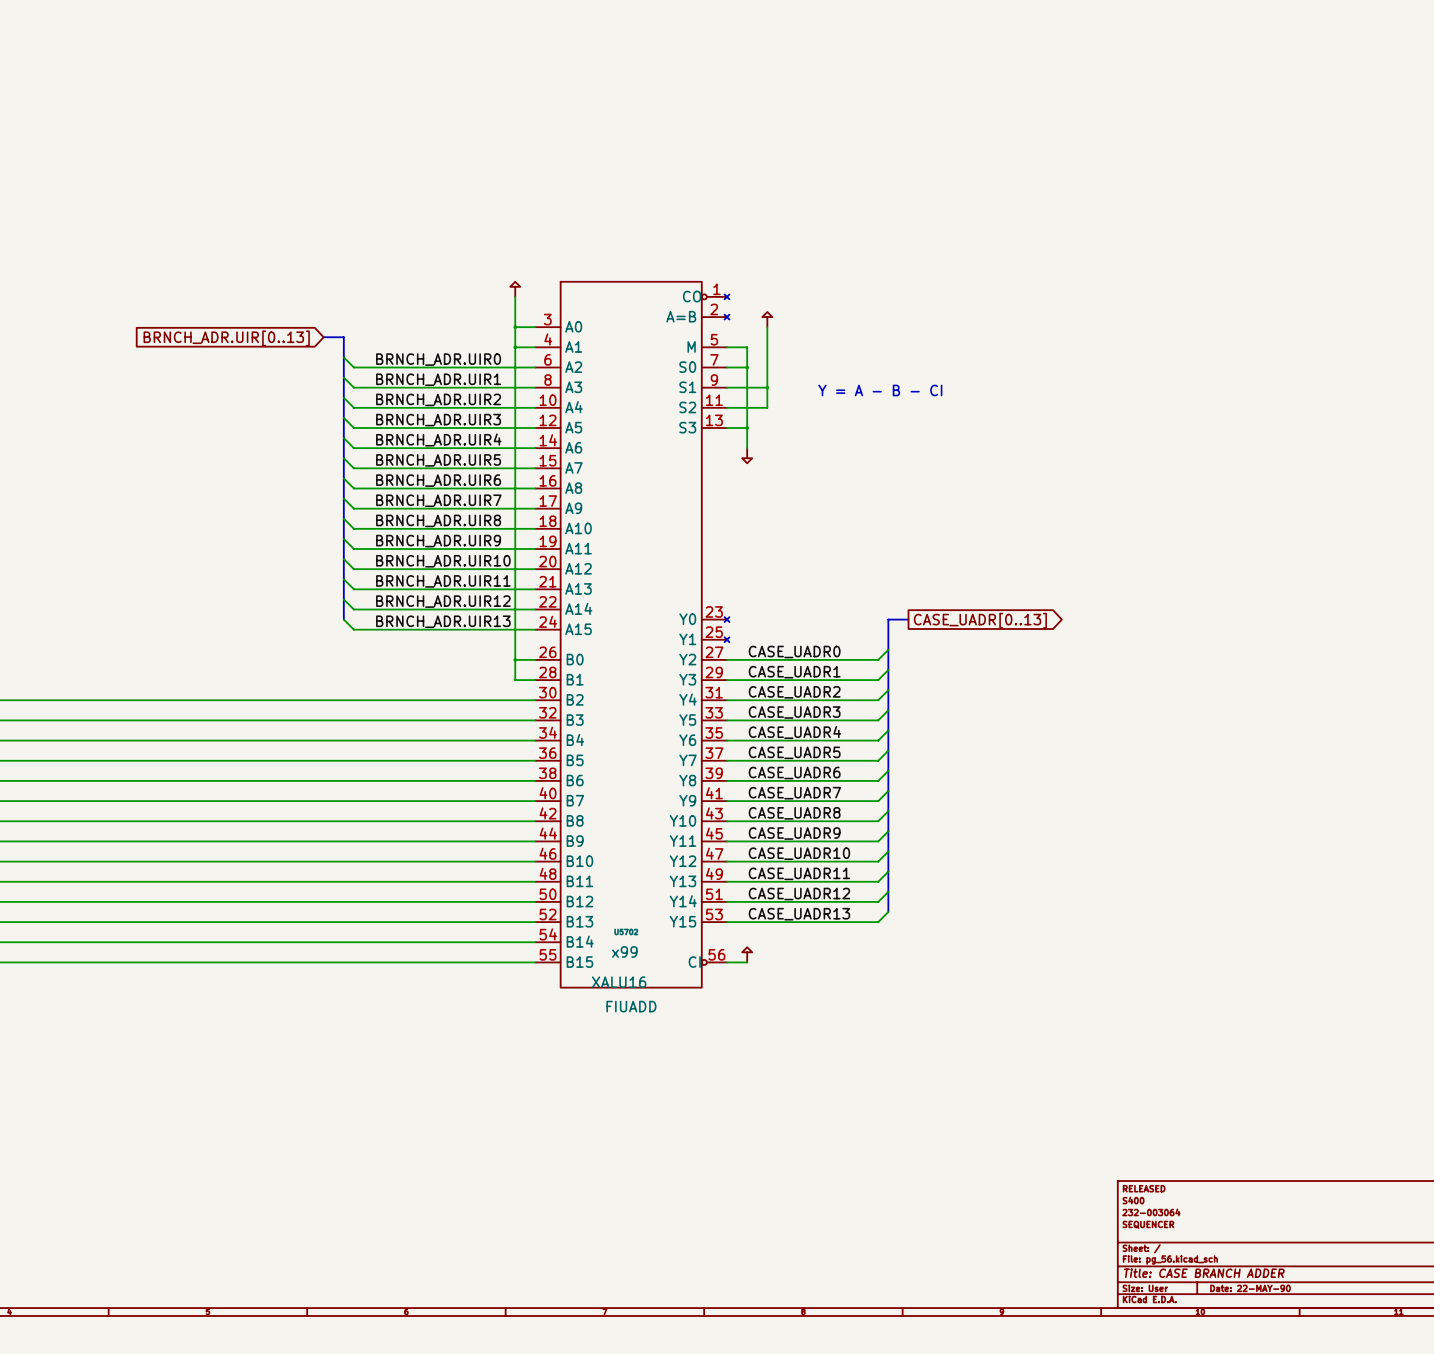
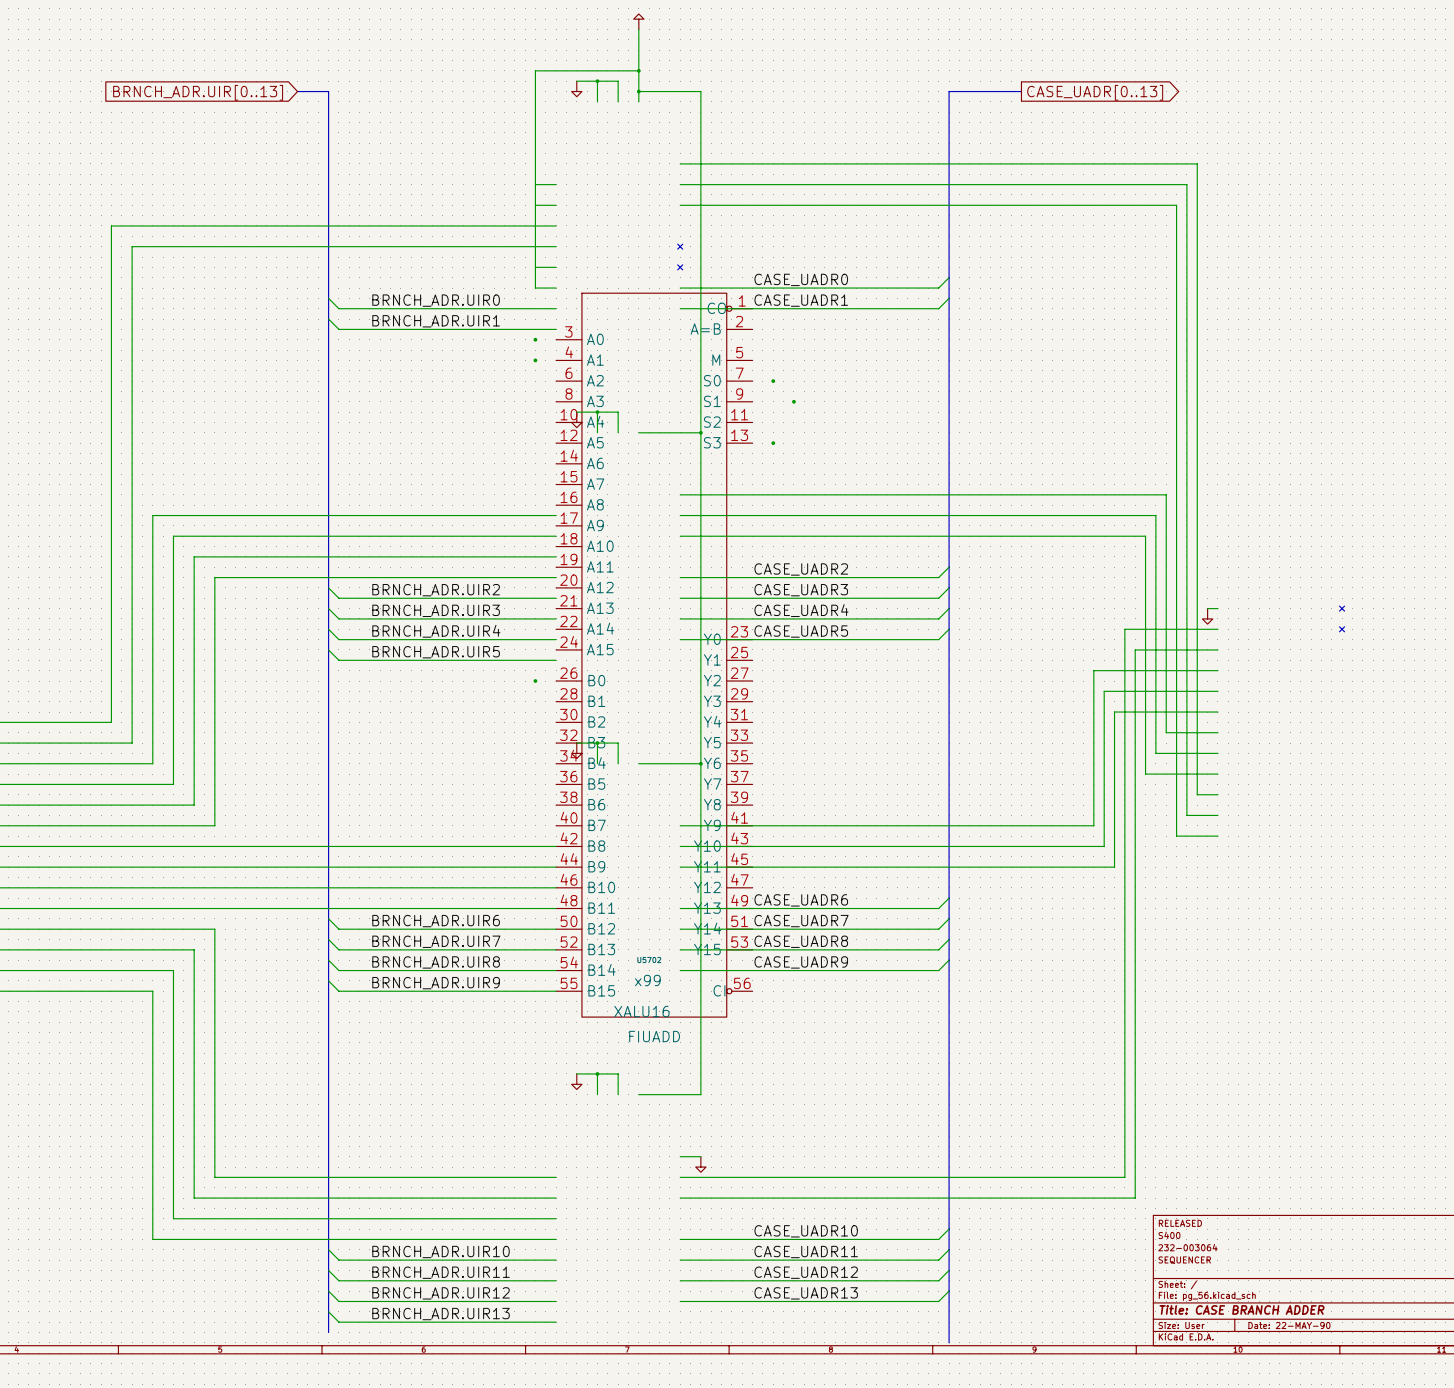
power symbol: none -> (638, 21)
wire: none -> (638, 29) (638, 101)
wire: none -> (638, 70) (535, 70) (535, 288) (556, 288)
junction: none -> (638, 70)
wire: none -> (576, 81) (618, 81) (618, 101)
wire: none -> (597, 81) (597, 101)
junction: none -> (597, 81)
power symbol: none -> (576, 89)
bus: none -> (297, 91) (328, 91) (328, 1332)
wire: none -> (638, 91) (700, 91) (700, 1094) (638, 1094)
junction: none -> (638, 91)
bus: none -> (1021, 91) (949, 91) (949, 1342)
global label: none -> BRNCH_ADR.UIR[0..13] (198, 92)
global label: none -> CASE_UADR[0..13] (1095, 92)
wire: none -> (680, 163) (1197, 163) (1197, 794) (1217, 794)
wire: none -> (535, 184) (556, 184)
wire: none -> (680, 184) (1186, 184) (1186, 815) (1217, 815)
wire: none -> (535, 205) (556, 205)
wire: none -> (680, 205) (1176, 205) (1176, 836) (1217, 836)
no-connect mark: none -> (680, 246)
no-connect mark: none -> (680, 267)
wire: none -> (949, 277) (938, 288) (680, 288)
label: none -> CASE_UADR0 (801, 279)
wire: none -> (328, 298) (338, 308) (556, 308)
wire: none -> (949, 298) (938, 308) (680, 308)
power symbol: (515, 289) -> none
label: none -> CASE_UADR1 (801, 300)
wire: (515, 296) (515, 680) (535, 680) -> none
no-connect mark: (727, 296) -> none
wire: none -> (328, 319) (338, 329) (556, 329)
no-connect mark: (727, 317) -> none
power symbol: (767, 319) -> none
wire: (515, 327) (535, 327) -> (535, 267) (556, 267)
wire: (767, 327) (767, 407) (727, 407) -> none
bus: (323, 337) (343, 337) (343, 619) -> none
global label: BRNCH_ADR.UIR[0..13] (226, 338) -> none
wire: (515, 347) (535, 347) -> none
wire: (727, 347) (747, 347) (747, 448) -> none
wire: (343, 357) (353, 367) (535, 367) -> none
label position: BRNCH_ADR.UIR0 (438, 359) -> BRNCH_ADR.UIR0 (436, 300)
wire: (727, 367) (747, 367) -> none
wire: (343, 377) (353, 387) (535, 387) -> none
label position: BRNCH_ADR.UIR1 (438, 379) -> BRNCH_ADR.UIR1 (436, 321)
wire: (727, 387) (767, 387) -> none
text: Y = A - B - CI (880, 390) -> none
wire: (343, 397) (353, 407) (535, 407) -> none
wire: none -> (576, 412) (618, 412) (618, 432)
wire: none -> (597, 412) (597, 432)
junction: none -> (597, 412)
label: BRNCH_ADR.UIR2 (438, 399) -> none
power symbol: none -> (576, 420)
wire: (343, 417) (353, 428) (535, 428) -> none
wire: none -> (638, 432) (700, 432)
junction: none -> (700, 432)
label: BRNCH_ADR.UIR3 (438, 420) -> none
wire: (727, 428) (747, 428) -> none
wire: (343, 438) (353, 448) (535, 448) -> none
label: BRNCH_ADR.UIR4 (438, 440) -> none
power symbol: (747, 455) -> none
wire: (343, 458) (353, 468) (535, 468) -> none
label: BRNCH_ADR.UIR5 (438, 460) -> none
wire: (343, 478) (353, 488) (535, 488) -> none
wire: none -> (680, 494) (1166, 494) (1166, 732) (1217, 732)
label: BRNCH_ADR.UIR6 (438, 480) -> none
wire: (343, 498) (353, 508) (535, 508) -> none
wire: none -> (680, 515) (1155, 515) (1155, 753) (1217, 753)
label: BRNCH_ADR.UIR7 (438, 500) -> none
wire: (343, 518) (353, 528) (535, 528) -> none
wire: none -> (680, 536) (1145, 536) (1145, 774) (1217, 774)
label: BRNCH_ADR.UIR8 (438, 520) -> none
wire: (343, 538) (353, 549) (535, 549) -> none
label: BRNCH_ADR.UIR9 (438, 541) -> none
wire: none -> (949, 567) (938, 577) (680, 577)
label: none -> CASE_UADR2 (801, 569)
wire: (343, 559) (353, 569) (535, 569) -> none
label: BRNCH_ADR.UIR10 (443, 561) -> none
wire: none -> (328, 587) (338, 598) (556, 598)
wire: none -> (949, 587) (938, 598) (680, 598)
label: none -> BRNCH_ADR.UIR2 (436, 590)
label: none -> CASE_UADR3 (801, 590)
wire: (343, 579) (353, 589) (535, 589) -> none
label: BRNCH_ADR.UIR11 (443, 581) -> none
wire: none -> (328, 608) (338, 618) (556, 618)
wire: none -> (949, 608) (938, 618) (680, 618)
wire: none -> (1207, 608) (1217, 608)
no-connect mark: none -> (1342, 608)
label: none -> BRNCH_ADR.UIR3 (436, 610)
label: none -> CASE_UADR4 (801, 610)
power symbol: none -> (1207, 616)
wire: (343, 599) (353, 609) (535, 609) -> none
label: BRNCH_ADR.UIR12 (443, 601) -> none
wire: none -> (328, 629) (338, 639) (556, 639)
wire: none -> (949, 629) (938, 639) (680, 639)
wire: none -> (1217, 629) (1124, 629) (1124, 1177) (680, 1177)
no-connect mark: none -> (1342, 629)
label: none -> BRNCH_ADR.UIR4 (436, 631)
label: none -> CASE_UADR5 (801, 631)
wire: (343, 619) (353, 629) (535, 629) -> none
no-connect mark: (727, 619) -> none
bus: (908, 619) (888, 619) (888, 912) -> none
global label: CASE_UADR[0..13] (980, 620) -> none
label: BRNCH_ADR.UIR13 (443, 621) -> none
wire: none -> (328, 649) (338, 660) (556, 660)
wire: none -> (1217, 649) (1135, 649) (1135, 1198) (680, 1198)
label: none -> BRNCH_ADR.UIR5 (436, 652)
no-connect mark: (727, 639) -> none
wire: (888, 649) (878, 659) (727, 659) -> none
label: CASE_UADR0 (794, 652) -> none
wire: (515, 659) (535, 659) -> none
wire: (888, 670) (878, 680) (727, 680) -> none
label: CASE_UADR1 (794, 672) -> none
wire: (888, 690) (878, 700) (727, 700) -> none
label: CASE_UADR2 (794, 692) -> none
wire: (101, 700) (535, 700) -> (111, 722) (111, 225) (556, 225)
wire: (888, 710) (878, 720) (727, 720) -> none
label: CASE_UADR3 (794, 712) -> none
wire: (121, 720) (535, 720) -> (132, 743) (132, 246) (556, 246)
wire: none -> (576, 743) (618, 743) (618, 763)
wire: none -> (597, 743) (597, 763)
junction: none -> (597, 743)
power symbol: none -> (576, 750)
wire: (888, 730) (878, 740) (727, 740) -> none
label: CASE_UADR4 (794, 732) -> none
wire: (142, 740) (535, 740) -> (152, 763) (152, 515) (556, 515)
wire: none -> (638, 763) (700, 763)
junction: none -> (700, 763)
wire: (888, 750) (878, 760) (727, 760) -> none
label: CASE_UADR5 (794, 752) -> none
wire: (162, 760) (535, 760) -> (173, 784) (173, 536) (556, 536)
wire: (888, 770) (878, 780) (727, 780) -> none
label: CASE_UADR6 (794, 773) -> none
wire: (182, 780) (535, 780) -> (194, 805) (194, 556) (556, 556)
wire: (888, 791) (878, 801) -> (1217, 670) (1093, 670) (1093, 825) (907, 825)
label: CASE_UADR7 (794, 793) -> none
wire: (202, 801) (535, 801) -> (214, 825) (214, 577) (556, 577)
wire: none -> (680, 825) (752, 825)
wire: (888, 811) (878, 821) -> (1217, 691) (1104, 691) (1104, 846) (907, 846)
label: CASE_UADR8 (794, 813) -> none
wire: none -> (680, 846) (752, 846)
wire: (888, 831) (878, 841) -> (1217, 712) (1114, 712) (1114, 867) (907, 867)
label: CASE_UADR9 (794, 833) -> none
wire: none -> (680, 867) (752, 867)
wire: (888, 851) (878, 861) (727, 861) -> none
label: CASE_UADR10 (799, 853) -> none
wire: (888, 871) (878, 881) -> (949, 898) (938, 908) (907, 908)
label: none -> CASE_UADR6 (801, 900)
label: CASE_UADR11 (799, 873) -> none
wire: none -> (680, 908) (752, 908)
wire: (888, 891) (878, 901) -> (949, 918) (938, 929) (907, 929)
label: none -> BRNCH_ADR.UIR6 (436, 921)
label: none -> CASE_UADR7 (801, 921)
label: CASE_UADR12 (799, 894) -> none
wire: (202, 901) (323, 901) -> (328, 918) (338, 929)
wire: none -> (214, 929) (214, 1177) (556, 1177)
wire: none -> (680, 929) (752, 929)
wire: (888, 912) (878, 922) -> (949, 939) (938, 949) (907, 949)
label: none -> BRNCH_ADR.UIR7 (436, 941)
label: none -> CASE_UADR8 (801, 941)
label: CASE_UADR13 (799, 914) -> none
wire: (182, 922) (323, 922) -> (328, 939) (338, 949)
wire: none -> (194, 949) (194, 1198) (556, 1198)
wire: none -> (680, 949) (752, 949)
wire: none -> (949, 960) (938, 970) (680, 970)
label: none -> BRNCH_ADR.UIR8 (436, 962)
label: none -> CASE_UADR9 (801, 962)
wire: (162, 942) (323, 942) -> (328, 960) (338, 970)
wire: none -> (173, 970) (173, 1218) (556, 1218)
label: none -> BRNCH_ADR.UIR9 (436, 983)
power symbol: (747, 954) -> none
wire: (142, 962) (323, 962) -> (328, 980) (338, 991)
wire: none -> (152, 991) (152, 1239) (556, 1239)
wire: (727, 962) (747, 962) -> none
wire: none -> (576, 1073) (618, 1073) (618, 1094)
wire: none -> (597, 1073) (597, 1094)
junction: none -> (597, 1073)
power symbol: none -> (576, 1081)
wire: none -> (680, 1156) (700, 1156)
power symbol: none -> (700, 1164)
wire: none -> (949, 1229) (938, 1239) (680, 1239)
label: none -> CASE_UADR10 (806, 1231)
wire: none -> (328, 1249) (338, 1260) (556, 1260)
wire: none -> (949, 1249) (938, 1260) (680, 1260)
label: none -> BRNCH_ADR.UIR10 (441, 1252)
label: none -> CASE_UADR11 (806, 1252)
wire: none -> (328, 1270) (338, 1280) (556, 1280)
wire: none -> (949, 1270) (938, 1280) (680, 1280)
label: none -> BRNCH_ADR.UIR11 (441, 1272)
label: none -> CASE_UADR12 (806, 1272)
wire: none -> (328, 1291) (338, 1301) (556, 1301)
wire: none -> (949, 1291) (938, 1301) (680, 1301)
label: none -> BRNCH_ADR.UIR12 (441, 1293)
label: none -> CASE_UADR13 (806, 1293)
wire: none -> (328, 1311) (338, 1322) (556, 1322)
label: none -> BRNCH_ADR.UIR13 (441, 1314)

